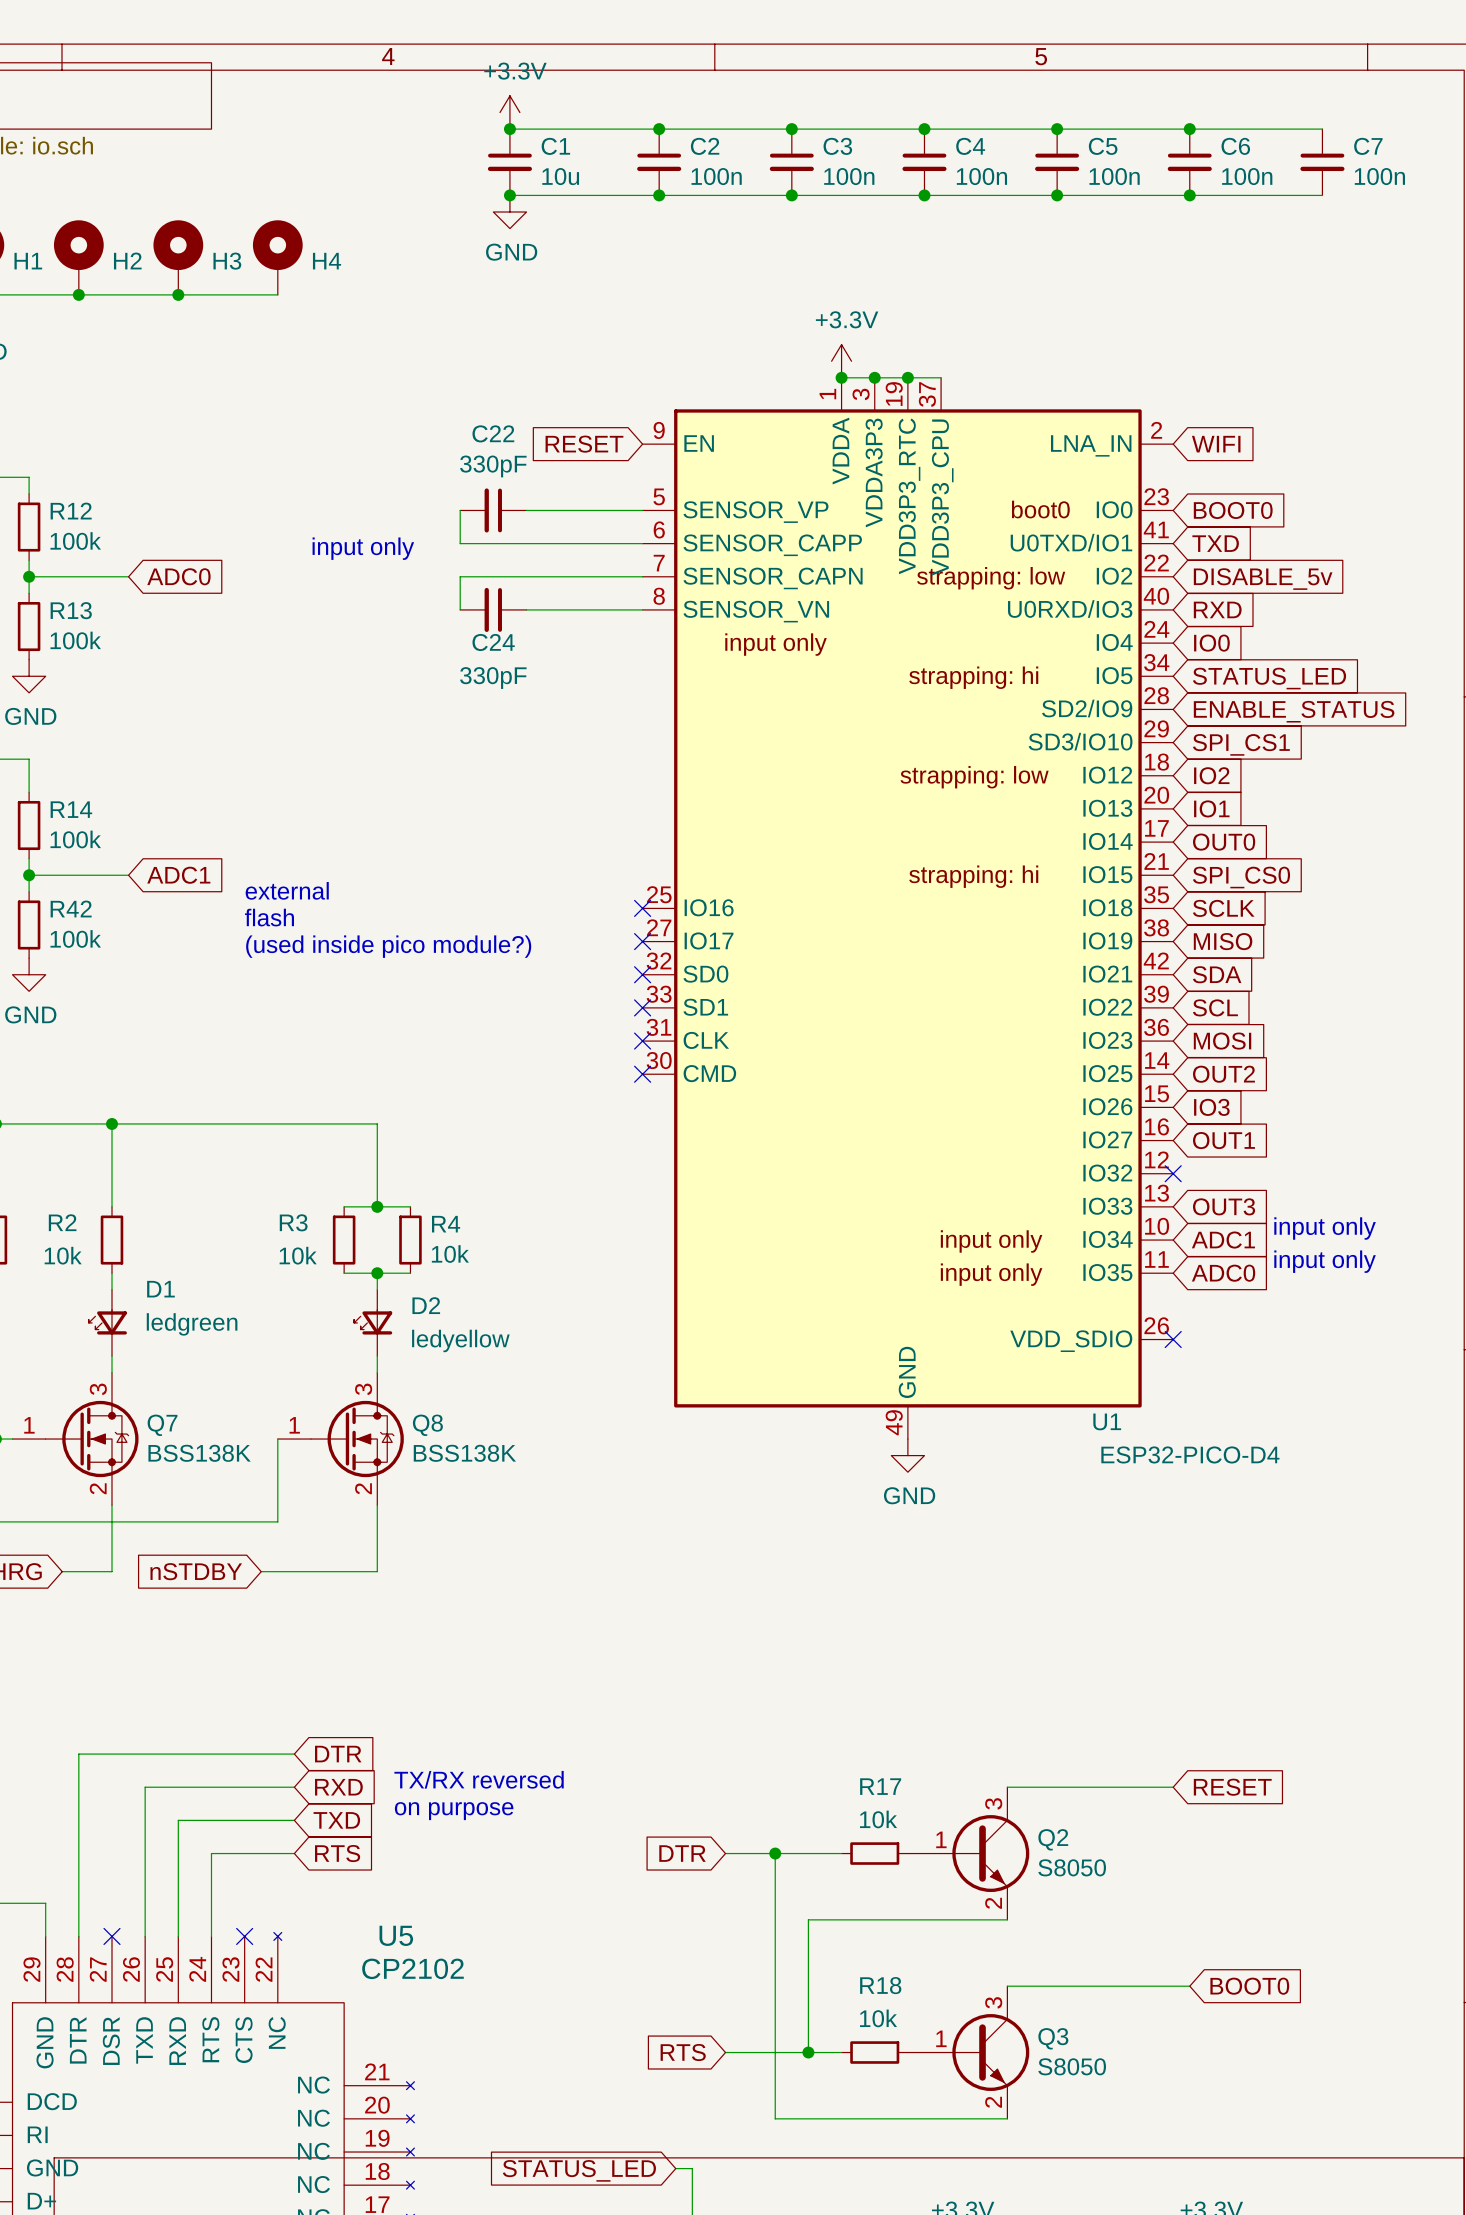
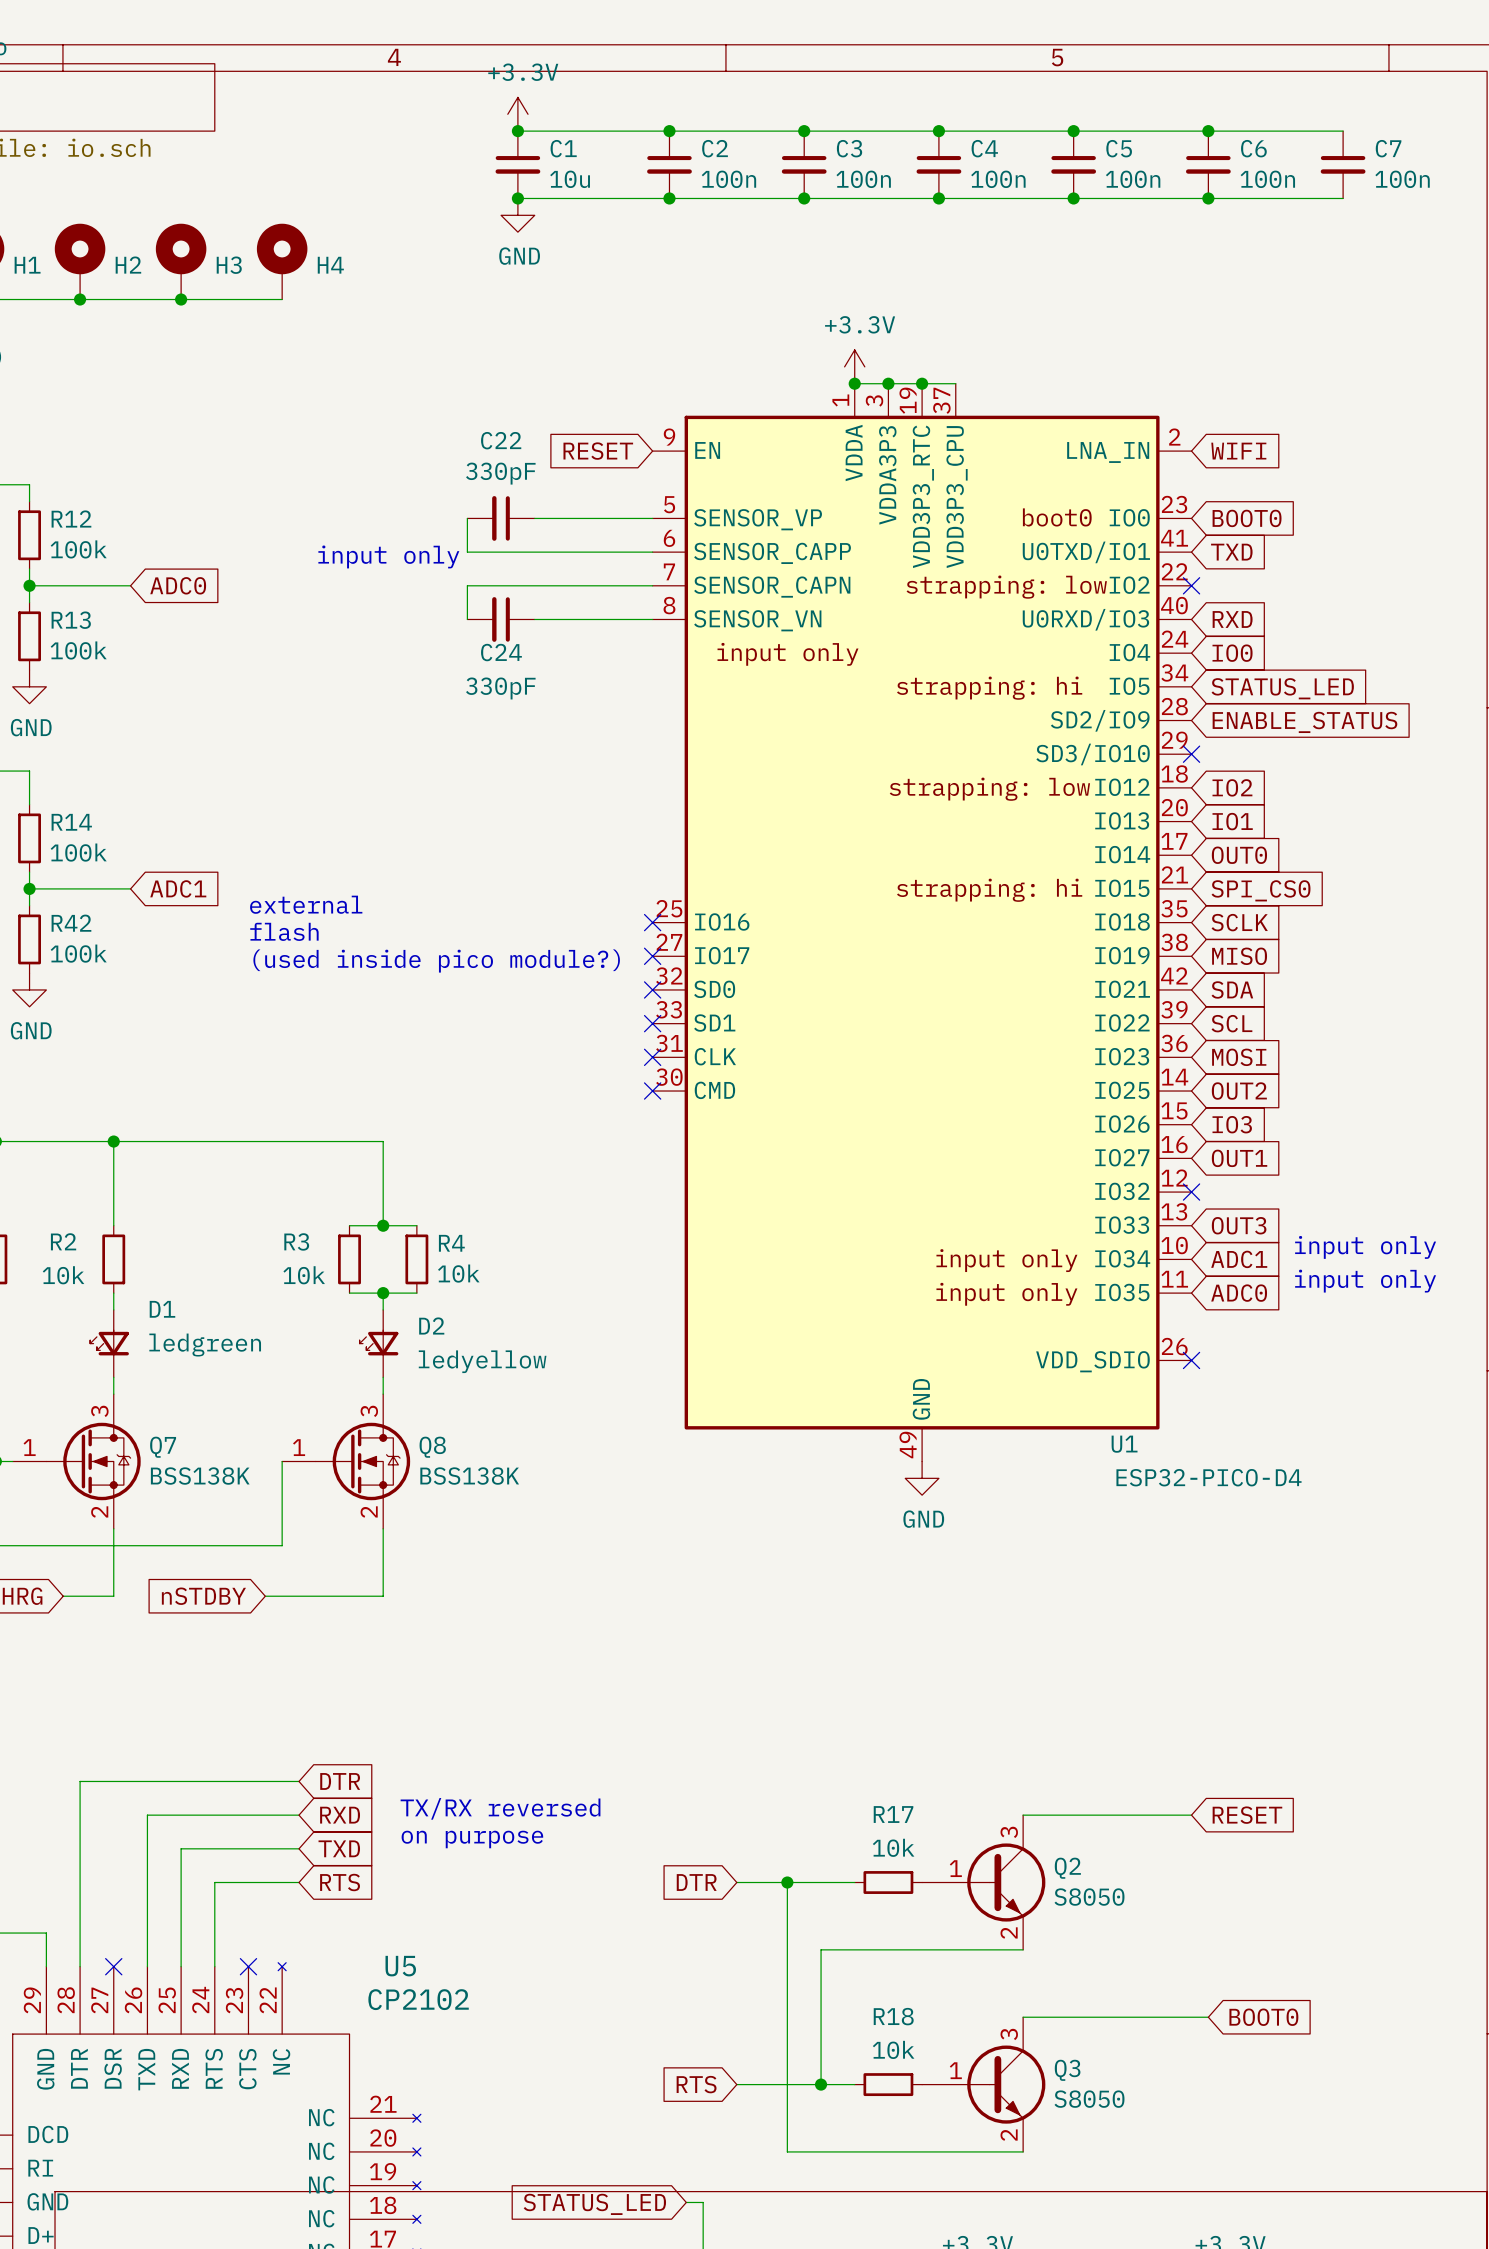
no-connect mark: none -> (1191, 585)
global label: DISABLE_5v (1263, 579) -> none
no-connect mark: none -> (1191, 754)
global label: SPI_CS1 (1241, 744) -> none

